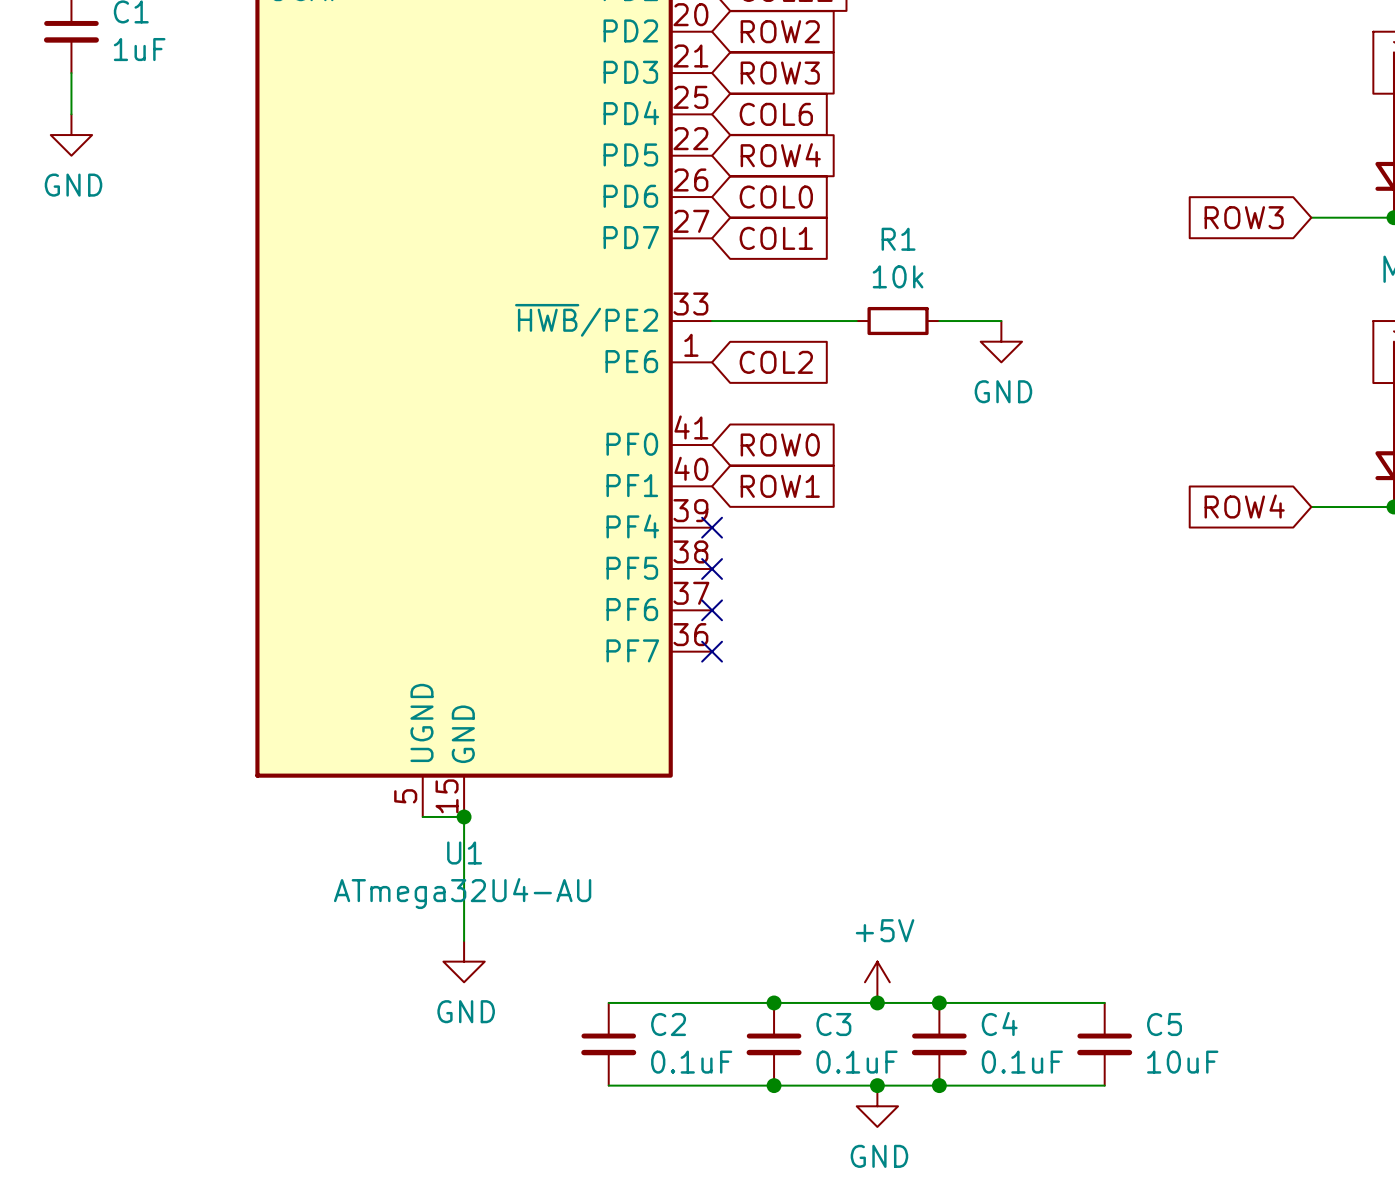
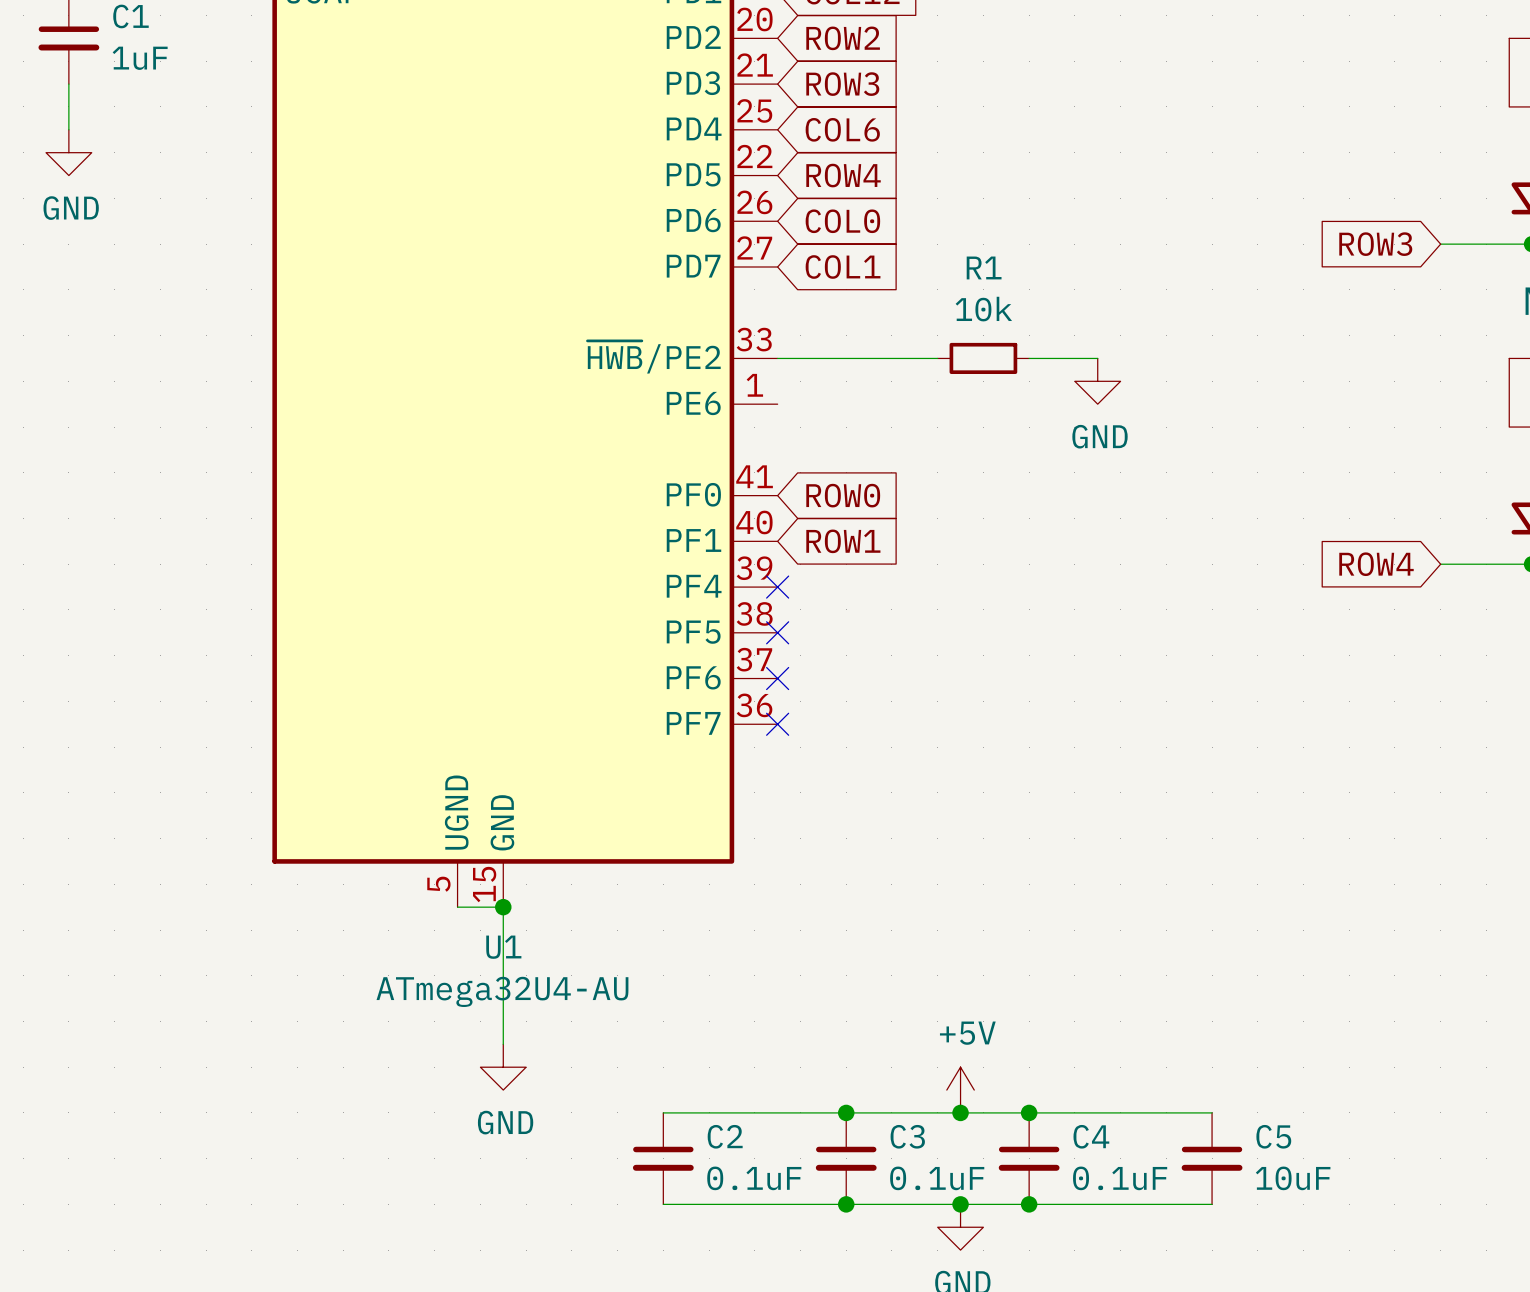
global label: COL2 (776, 362) -> none

